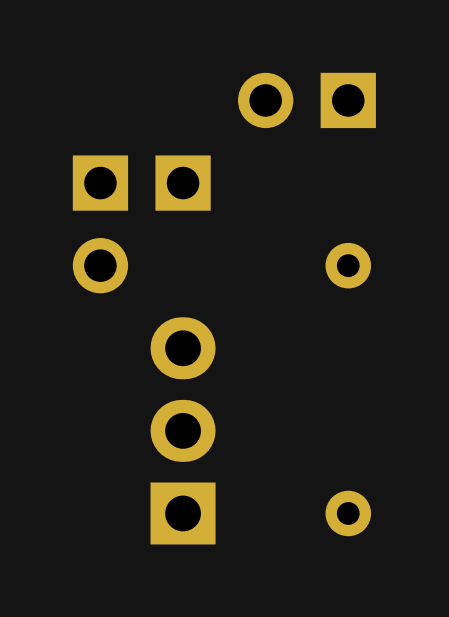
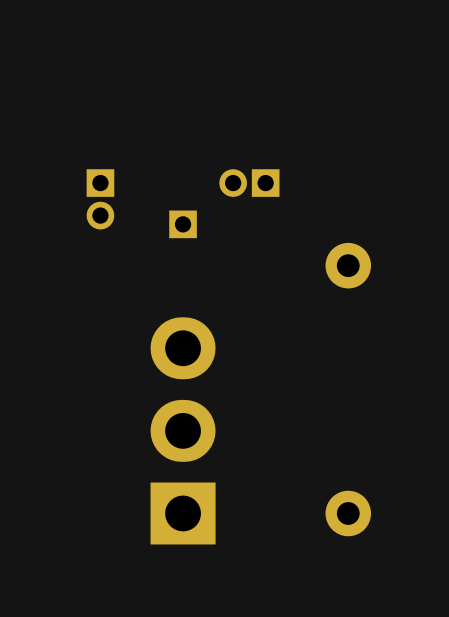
part: (306, 100) -> none
part footprint: [72, 155, 129, 294] -> [86, 169, 115, 230]
part: (183, 183) -> none
part: none -> (249, 183)
part: none -> (183, 224)

